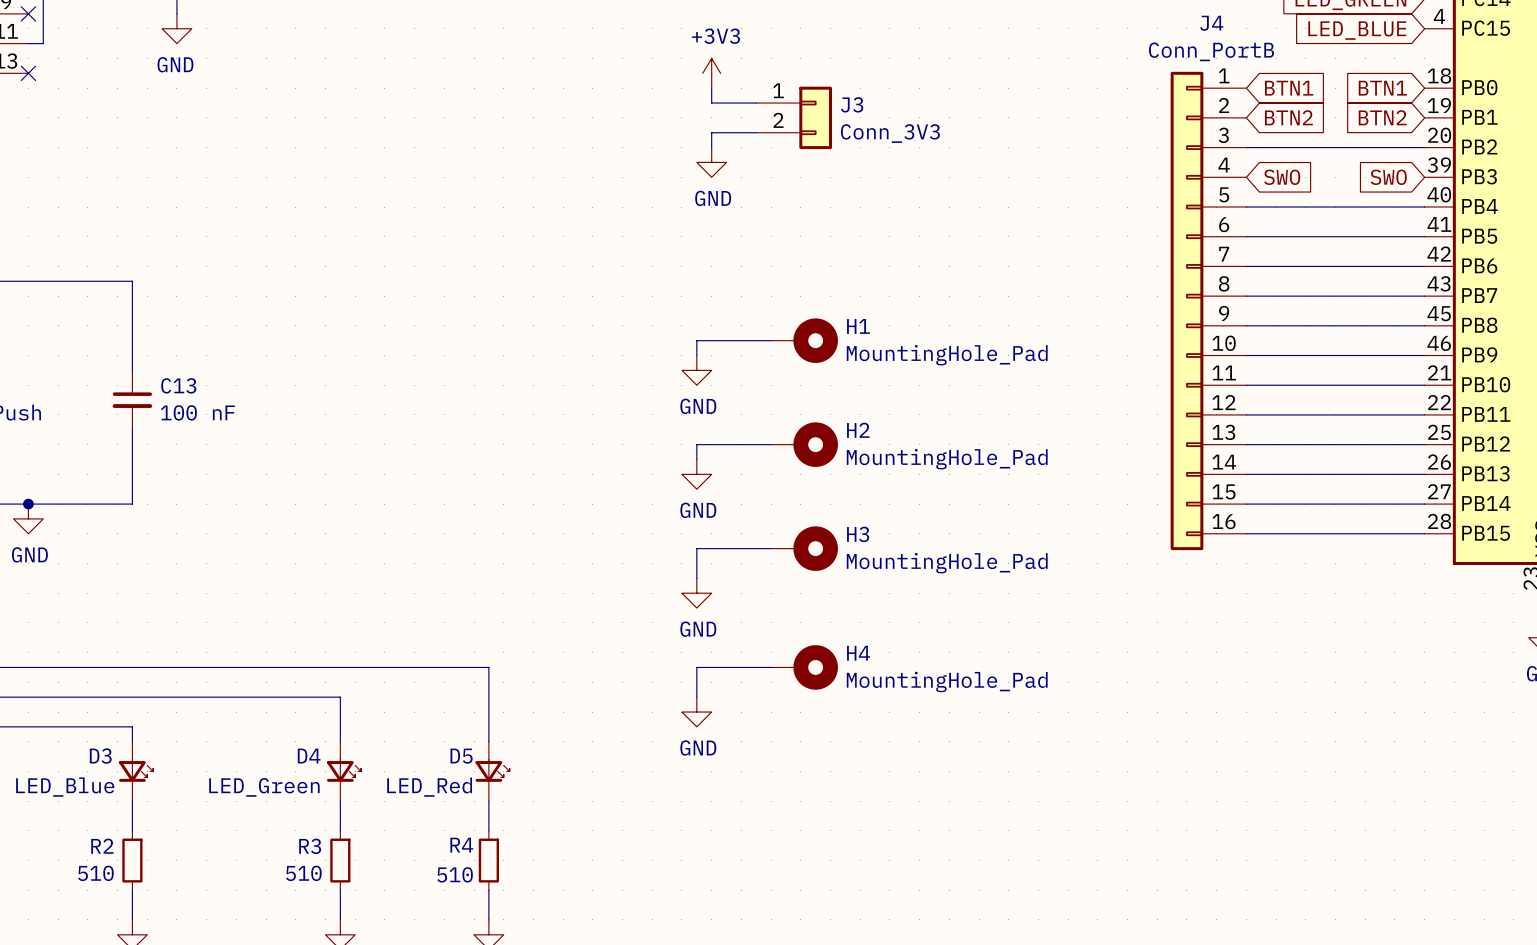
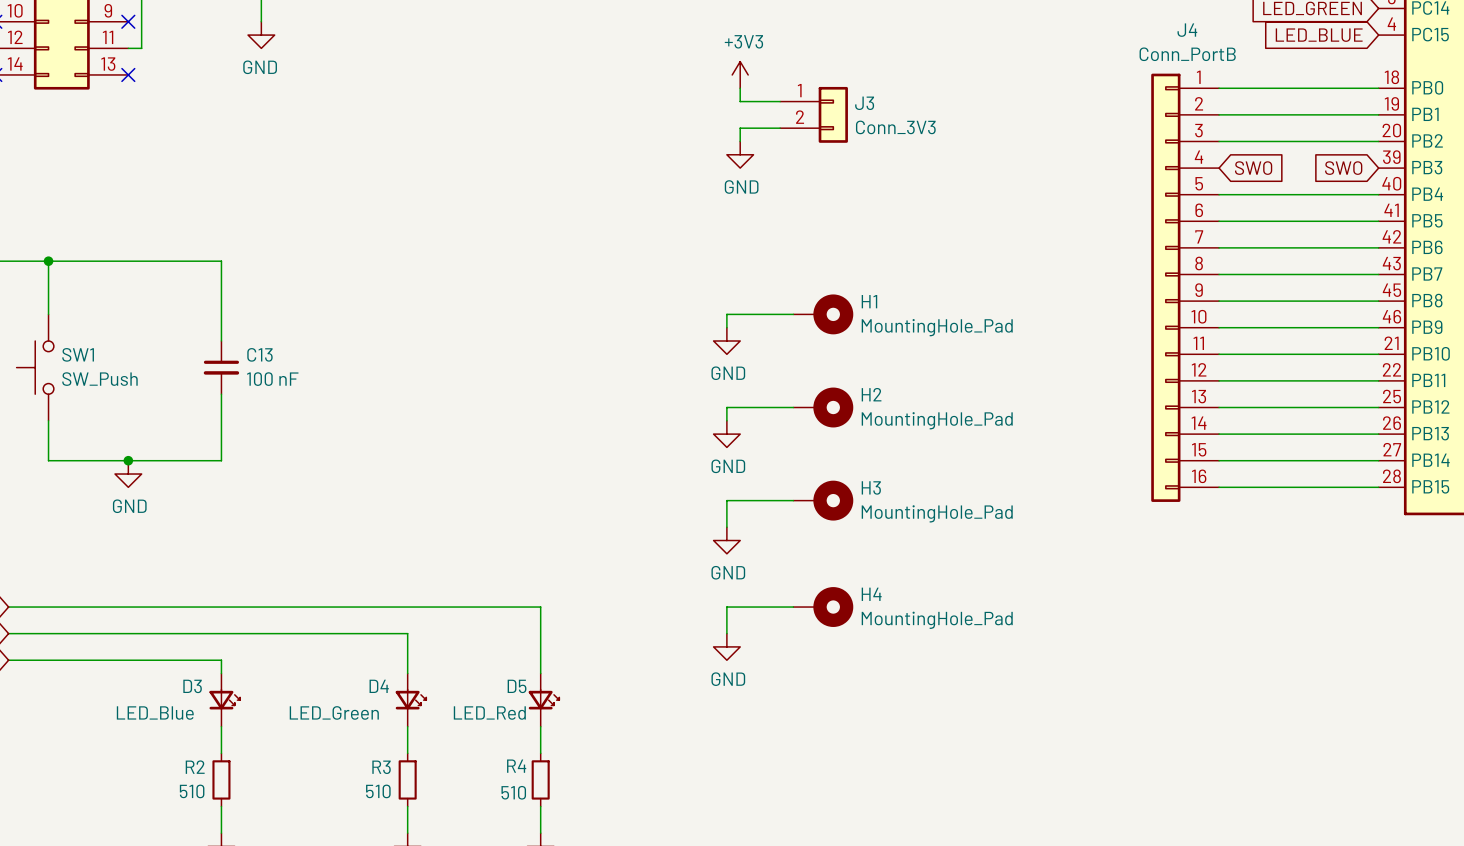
wire: none -> (1219, 88) (1378, 88)
global label: BTN1 (1289, 88) -> none
global label: BTN1 (1382, 88) -> none
wire: none -> (1219, 114) (1378, 114)
global label: BTN2 (1288, 117) -> none
global label: BTN2 (1382, 117) -> none

